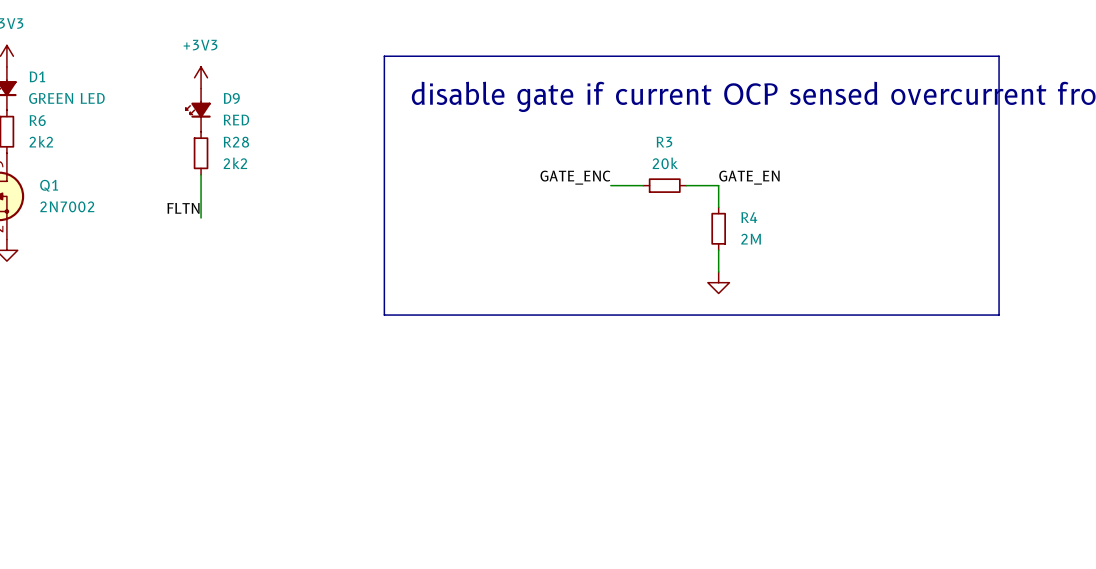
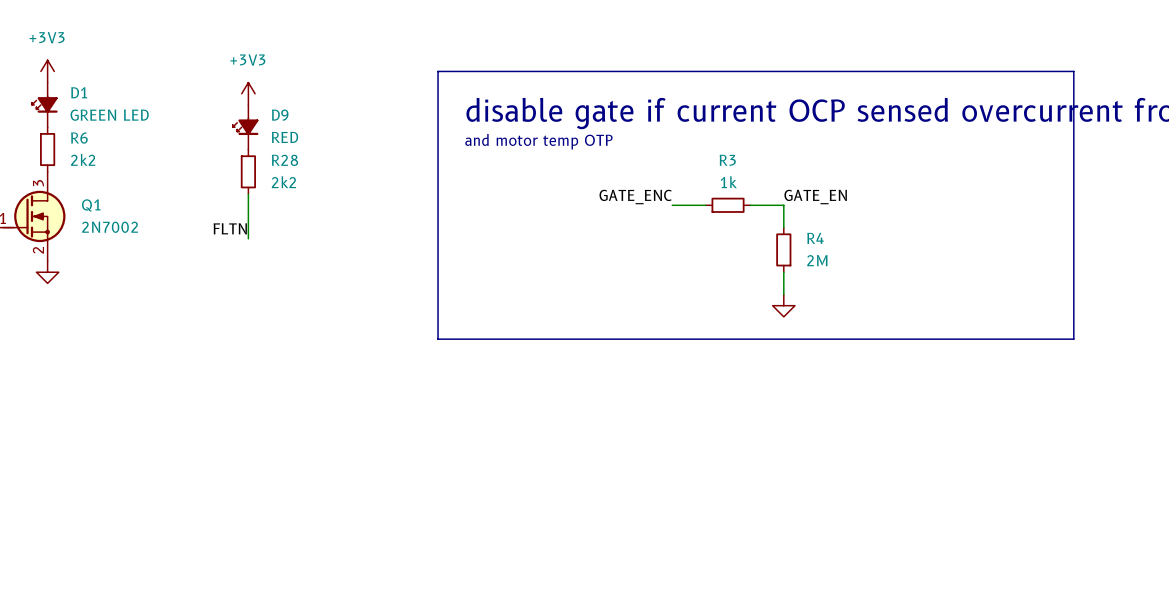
text: none -> and motor temp OTP (538, 141)
R3 value: 20k (665, 163) -> 1k (728, 182)

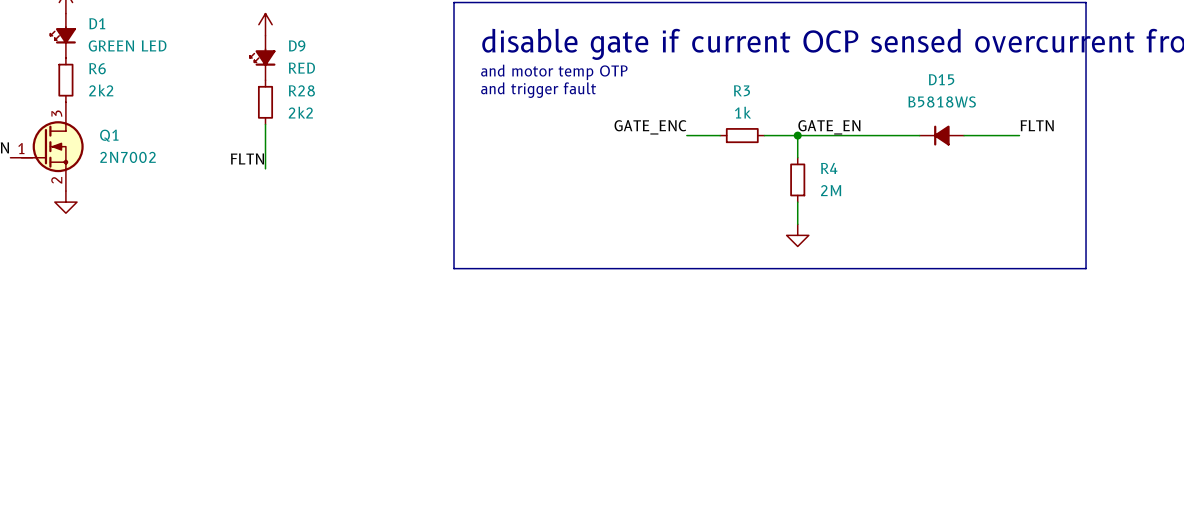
text: none -> and trigger fault (538, 90)
label: none -> FLTN (1037, 125)
wire: none -> (797, 135) (919, 135)
junction: none -> (797, 135)
D15: none -> B5818WS (941, 135)
wire: none -> (964, 135) (1019, 135)

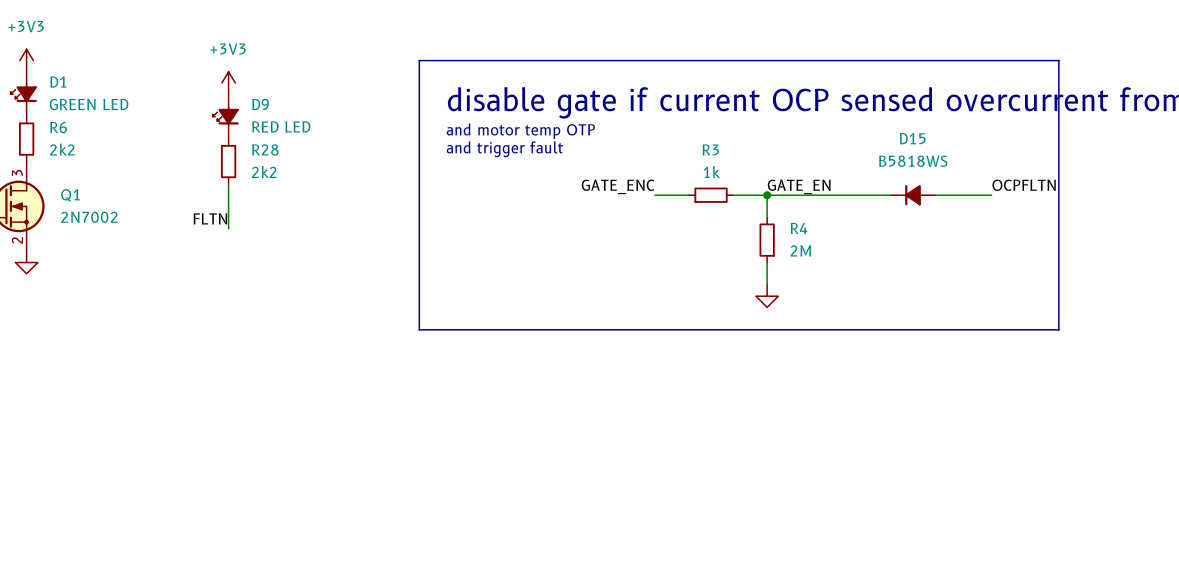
D9 value: RED (301, 68) -> RED LED (281, 126)
label: FLTN (1037, 125) -> OCPFLTN (1024, 185)

